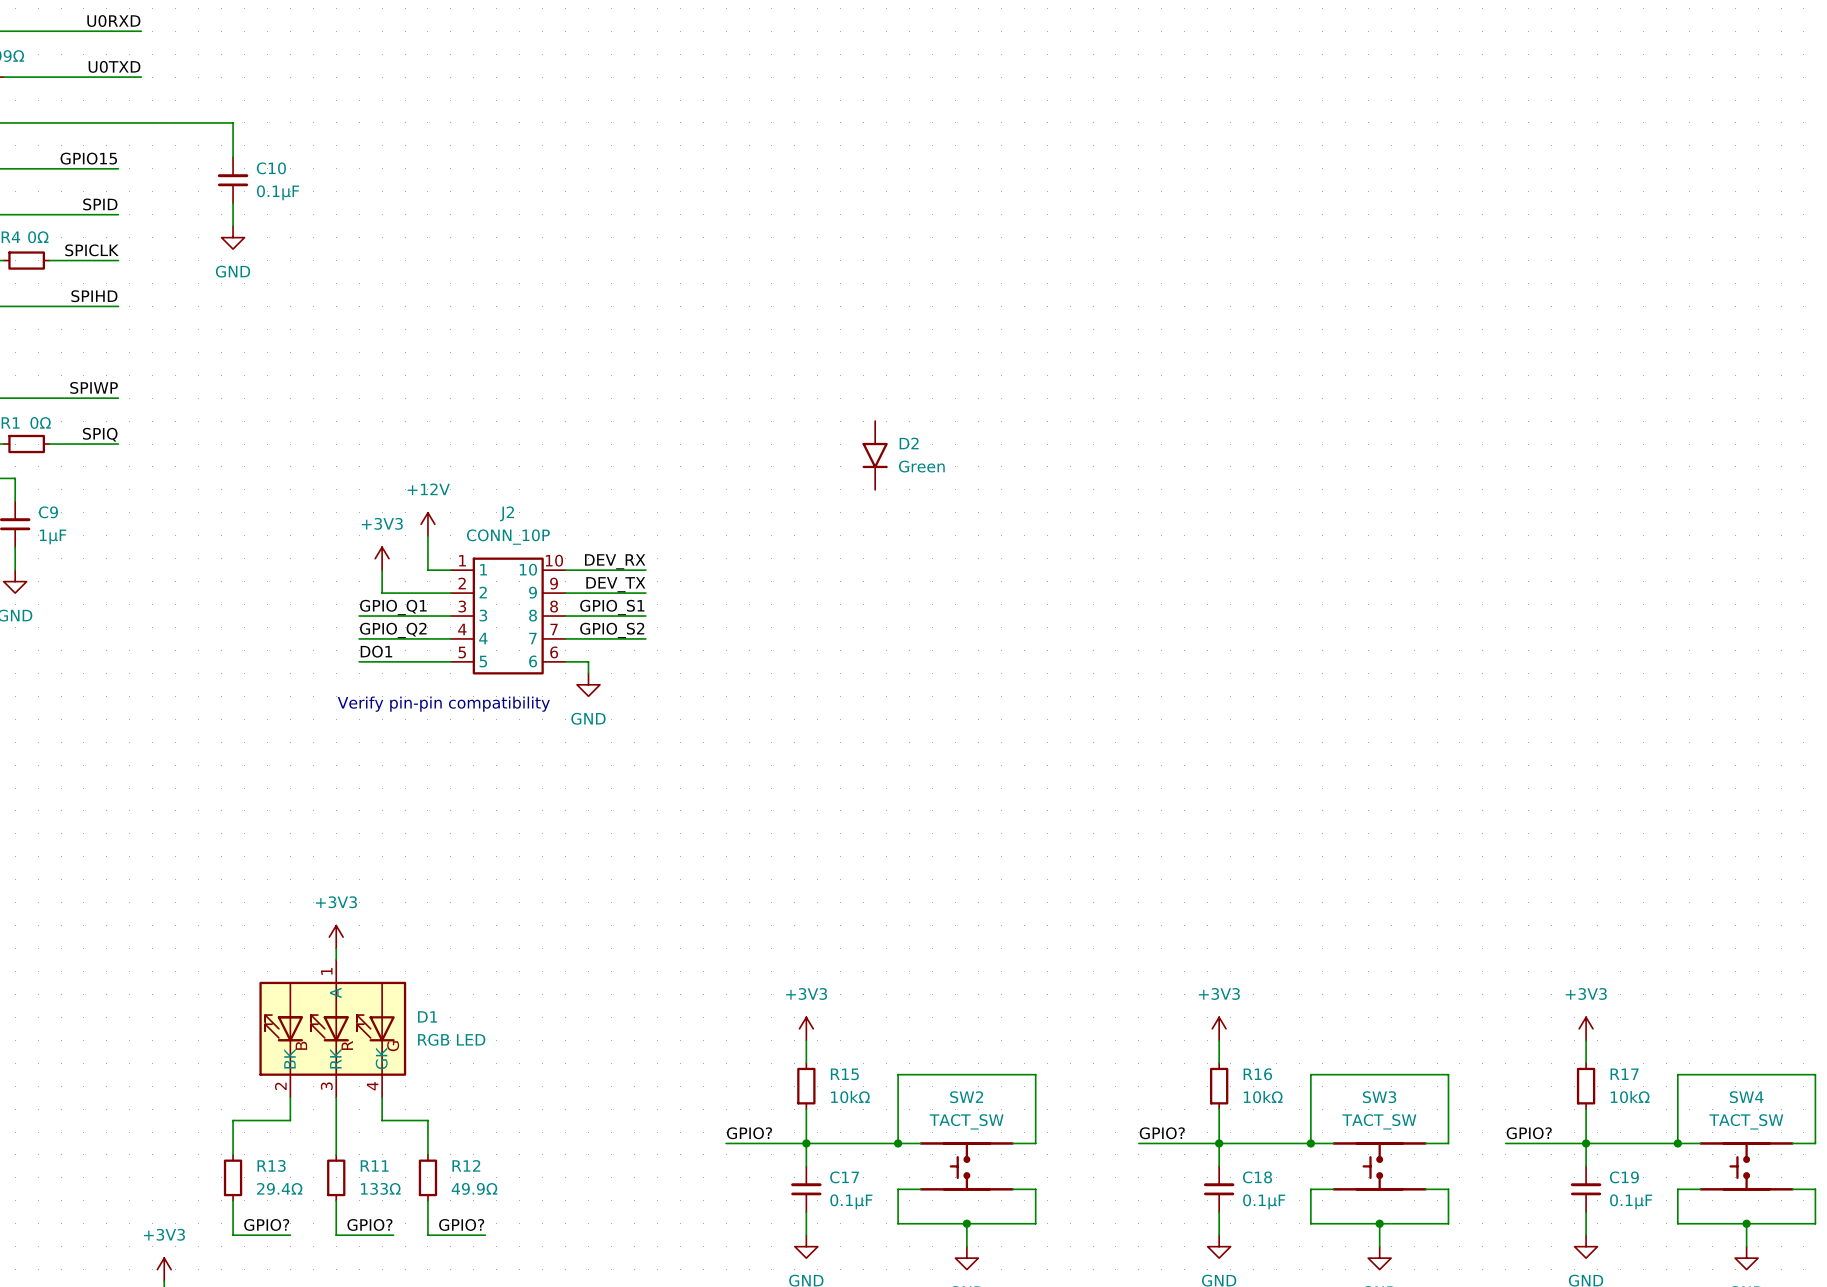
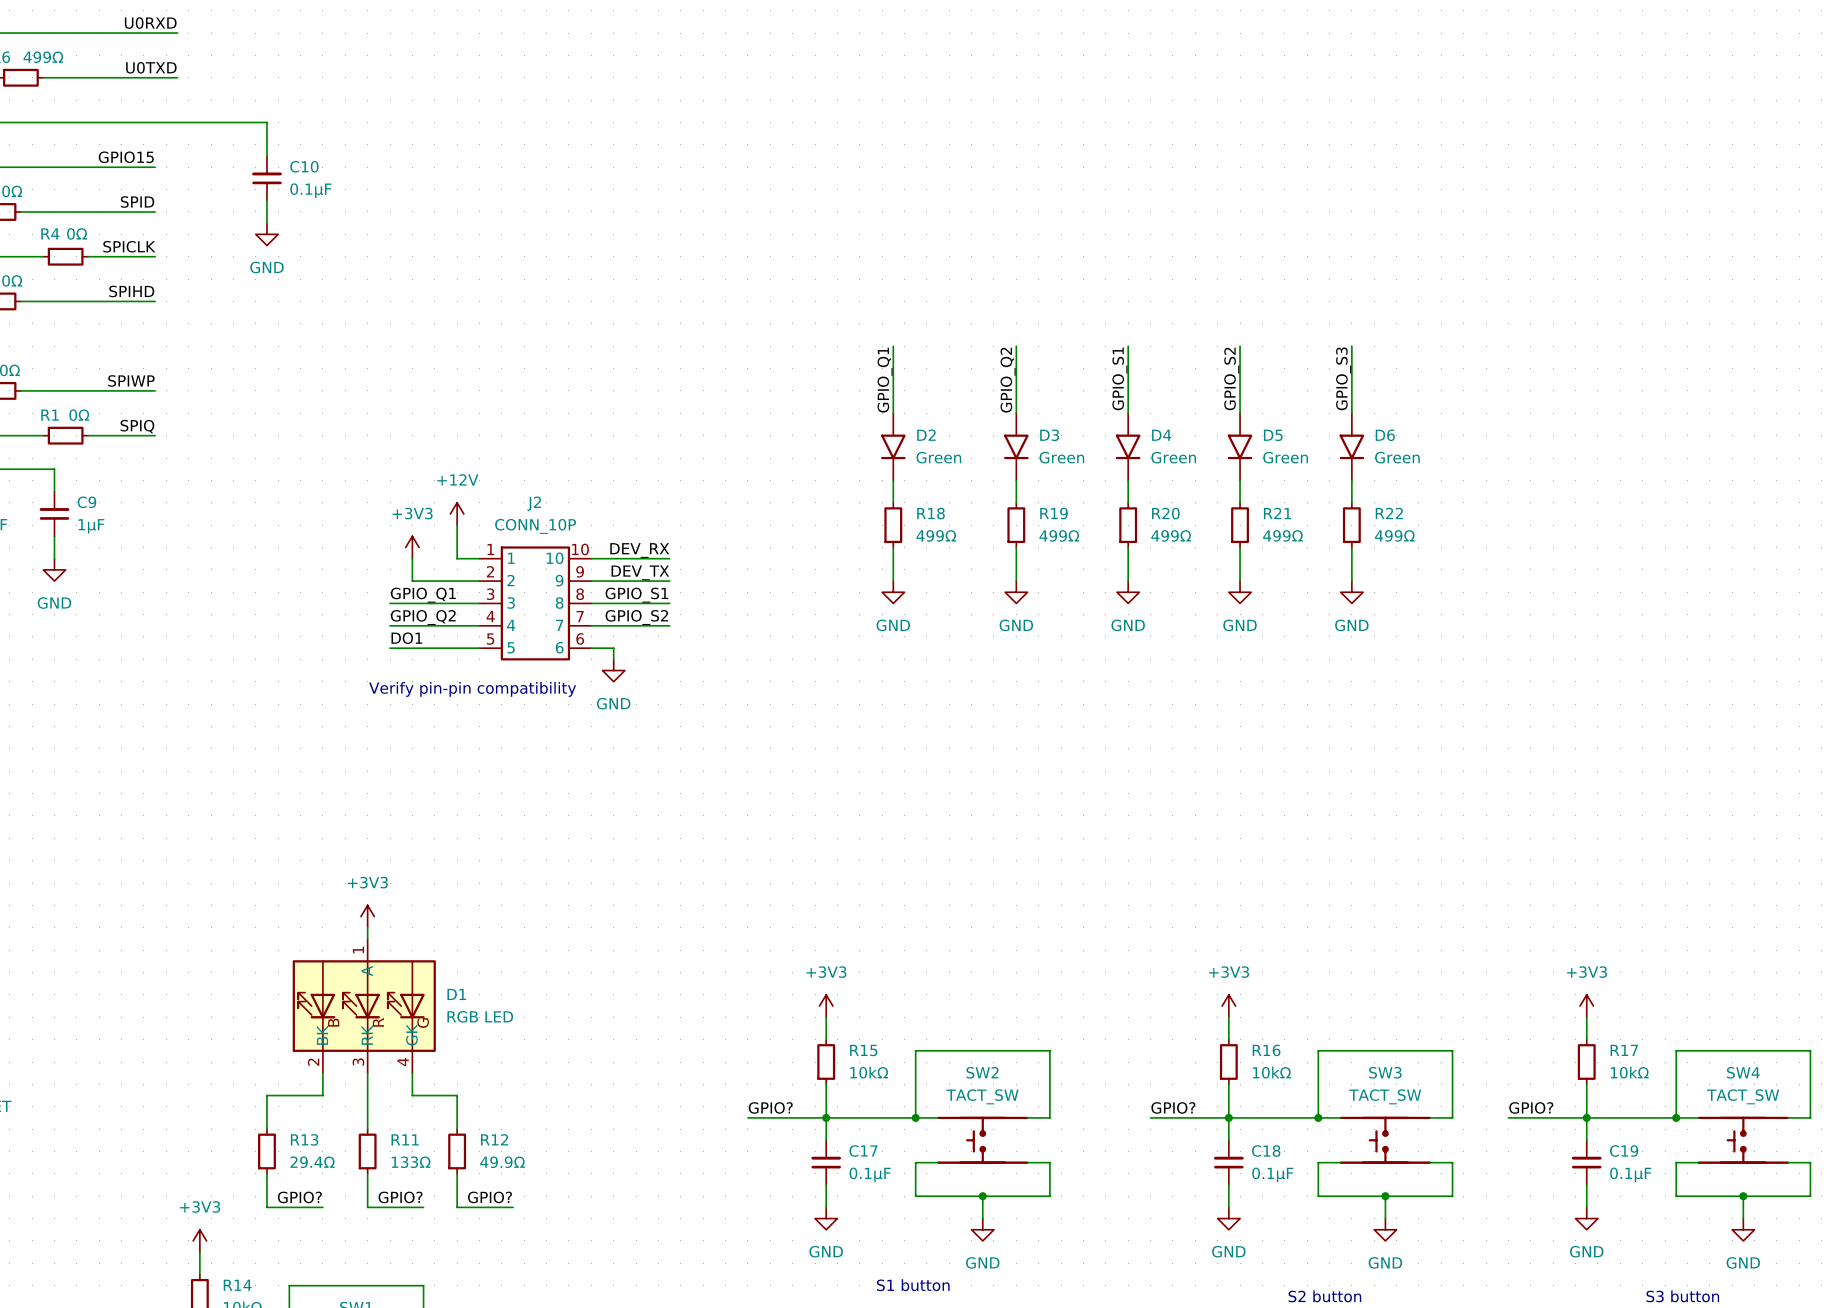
wire: none -> (893, 346) (893, 413)
wire: none -> (1016, 346) (1016, 413)
wire: none -> (1128, 346) (1128, 413)
wire: none -> (1240, 346) (1240, 413)
wire: none -> (1351, 346) (1351, 413)
label: none -> GPIO_S1 (1119, 378)
label: none -> GPIO_S2 (1231, 378)
label: none -> GPIO_S3 (1343, 378)
label: none -> GPIO_Q1 (885, 380)
label: none -> GPIO_Q2 (1008, 380)
D3: none -> (1016, 446)
D4: none -> (1128, 446)
D5: none -> (1240, 446)
D6: none -> (1351, 446)
wire: none -> (893, 480) (893, 502)
wire: none -> (1016, 480) (1016, 502)
wire: none -> (1128, 480) (1128, 502)
wire: none -> (1240, 480) (1240, 502)
wire: none -> (1351, 480) (1351, 502)
R18: none -> (893, 525)
R19: none -> (1016, 525)
R20: none -> (1128, 525)
R21: none -> (1240, 525)
R22: none -> (1351, 525)
wire: none -> (893, 547) (893, 581)
wire: none -> (1016, 547) (1016, 581)
wire: none -> (1128, 547) (1128, 581)
wire: none -> (1240, 547) (1240, 581)
wire: none -> (1351, 547) (1351, 581)
power symbol: none -> GND (893, 592)
power symbol: none -> GND (1016, 592)
power symbol: none -> GND (1128, 592)
power symbol: none -> GND (1240, 592)
power symbol: none -> GND (1351, 592)

